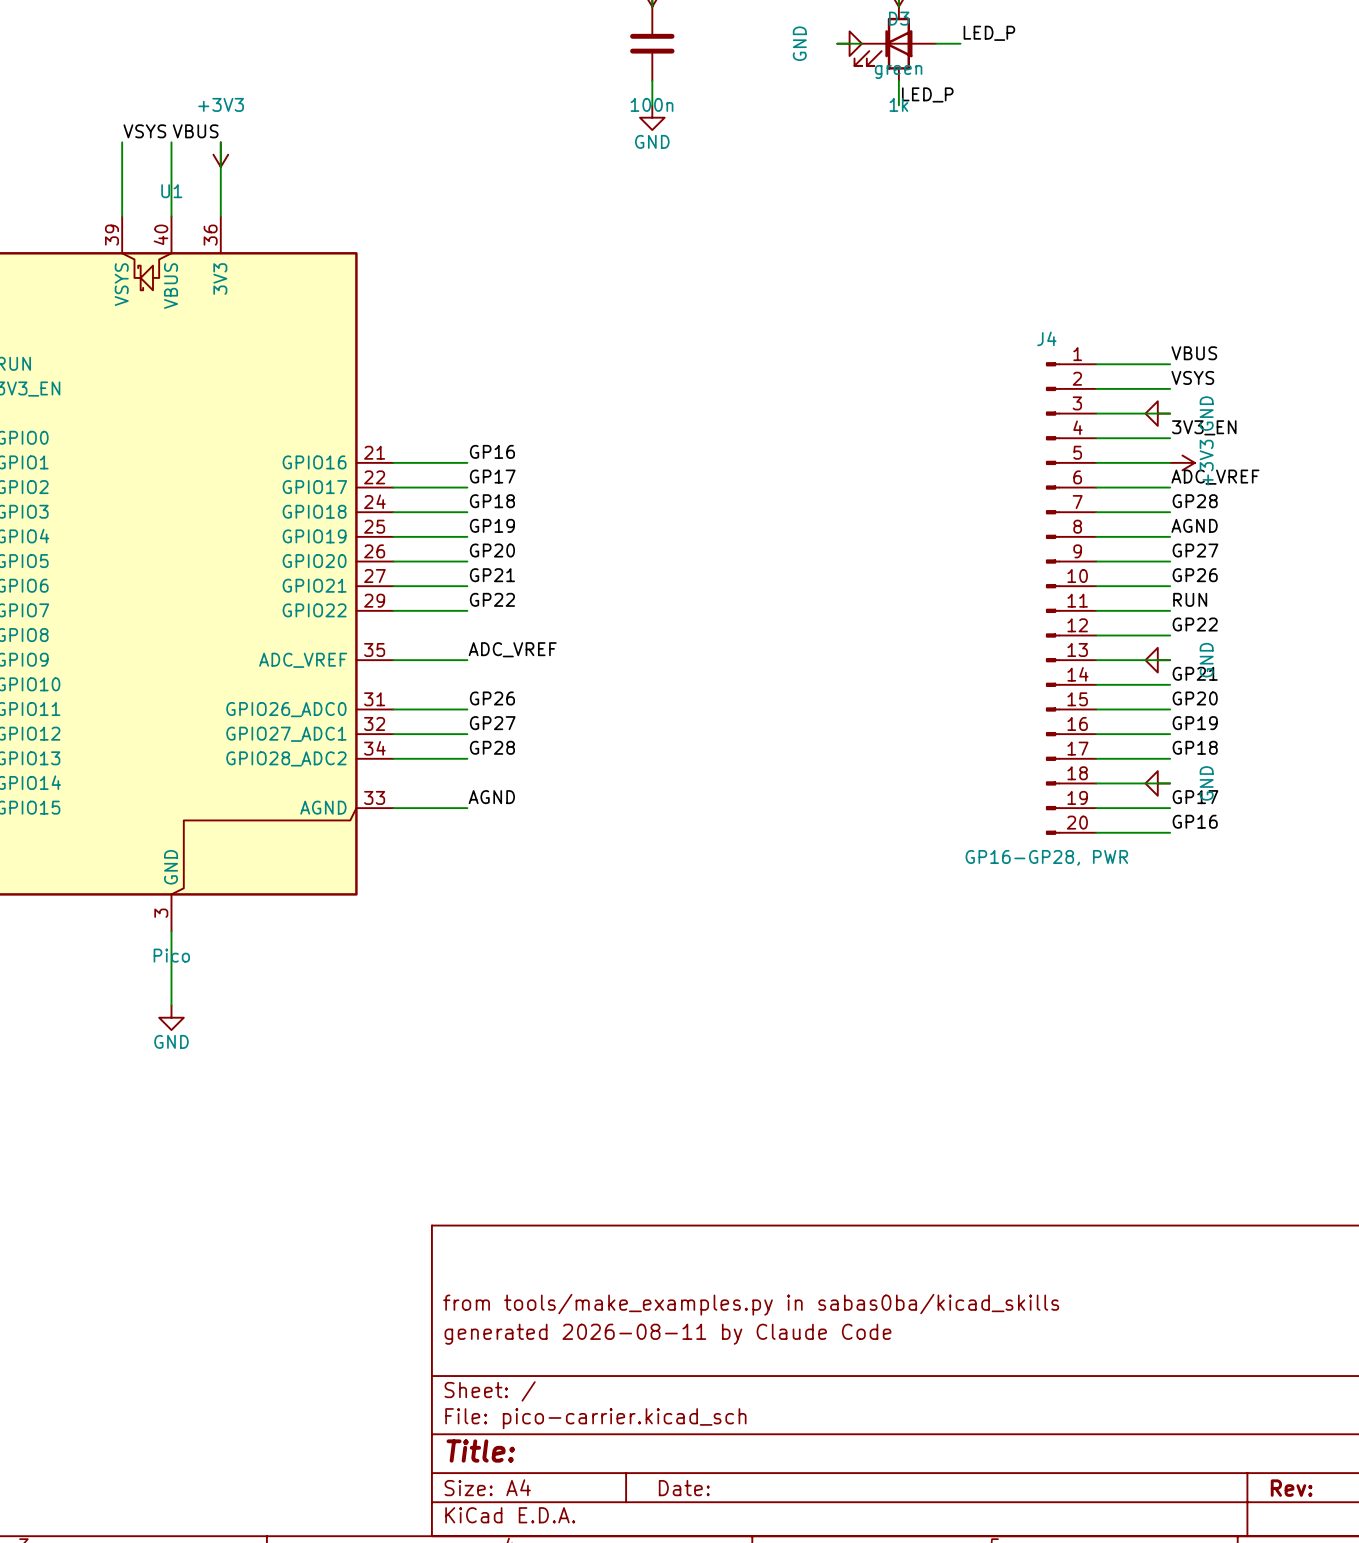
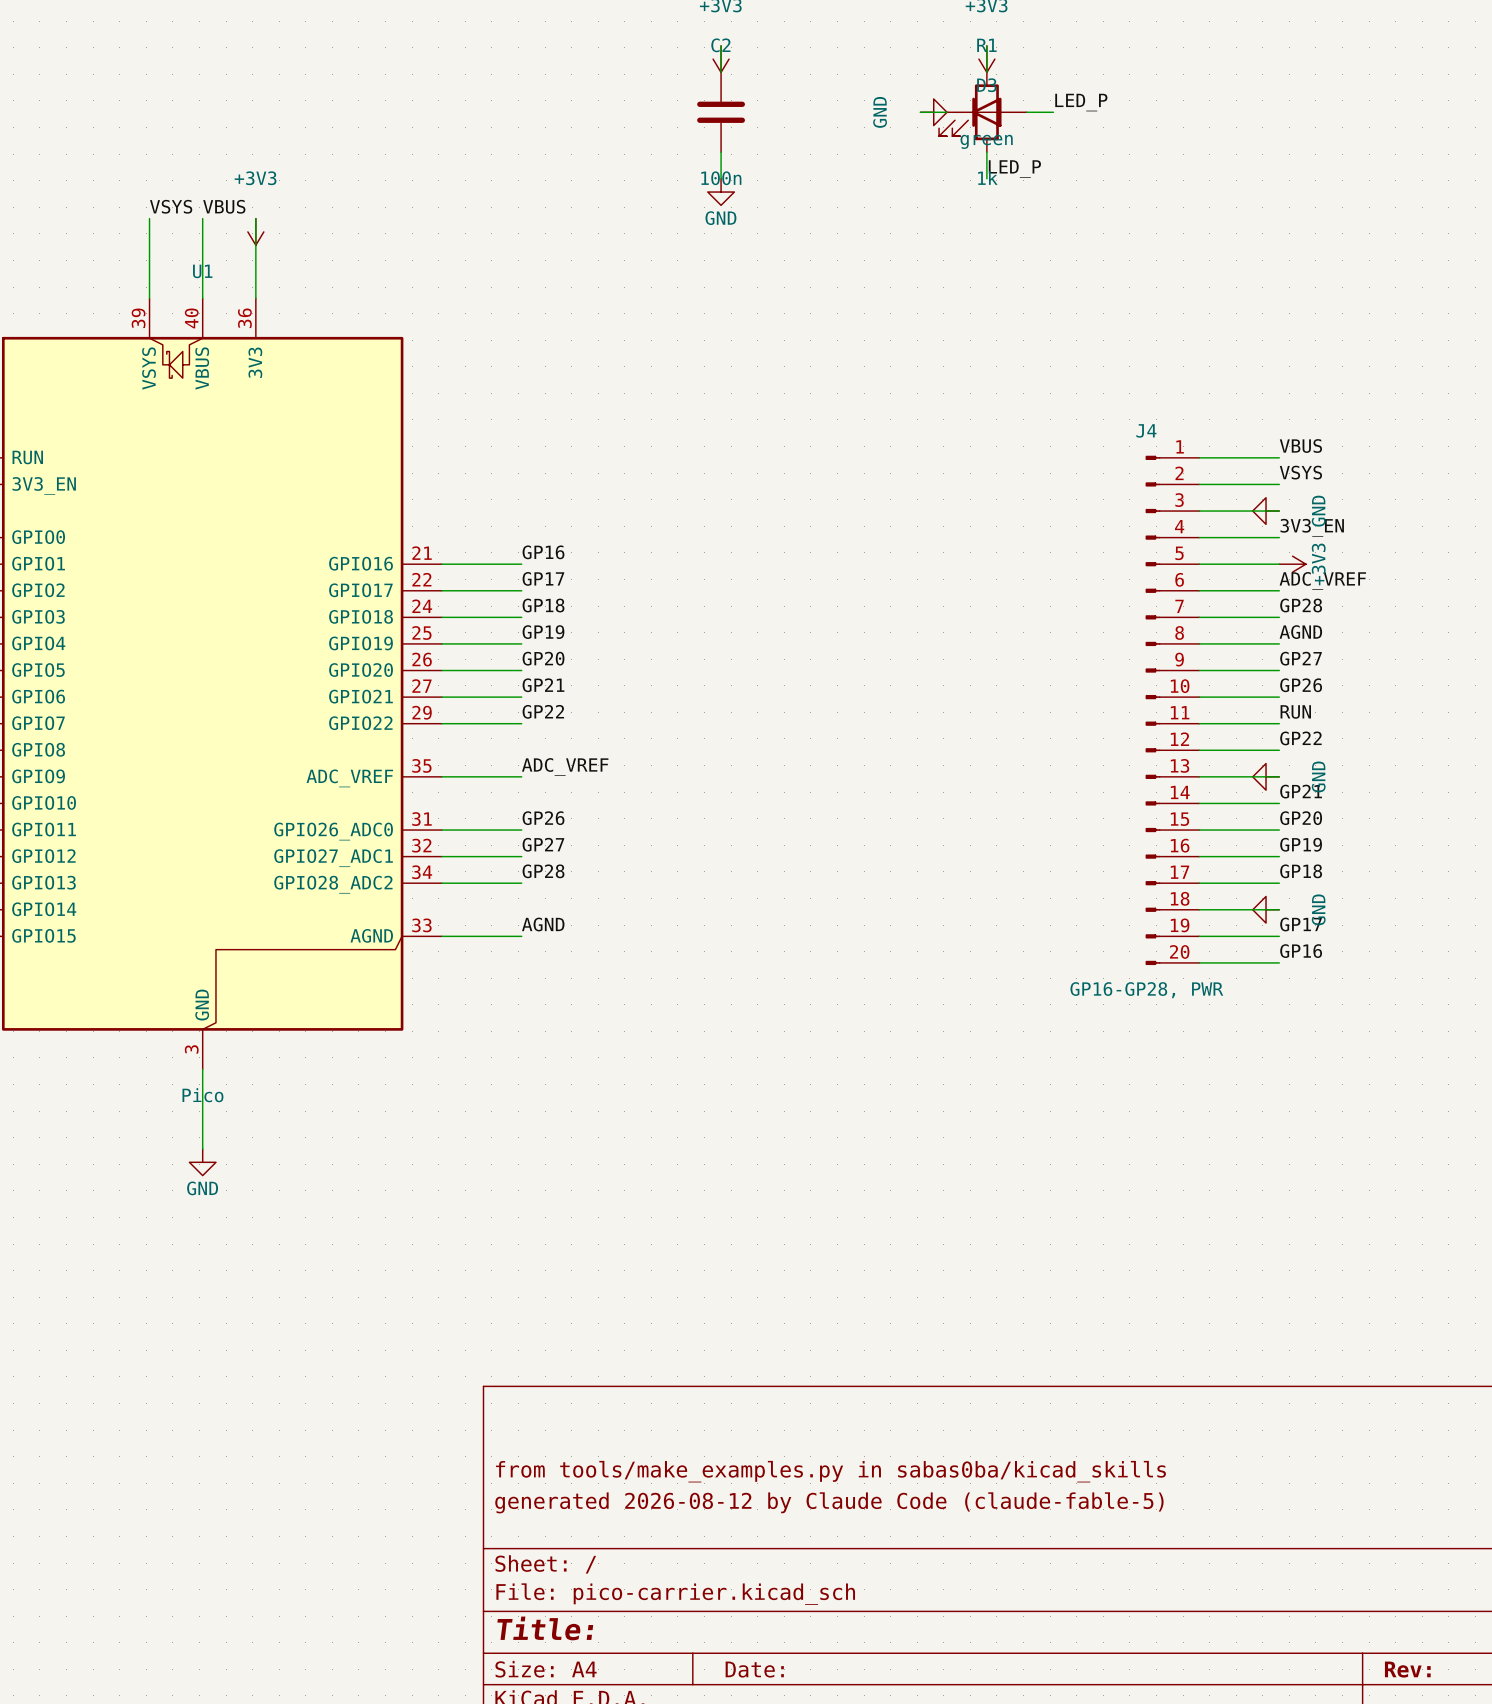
title block: generated 2026-08-11 by Claude Code (667, 1334) -> generated 2026-08-12 by Claude Code (claude-fable-5) (829, 1502)

